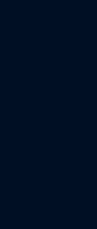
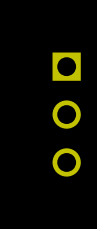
part: none -> (66, 114)

